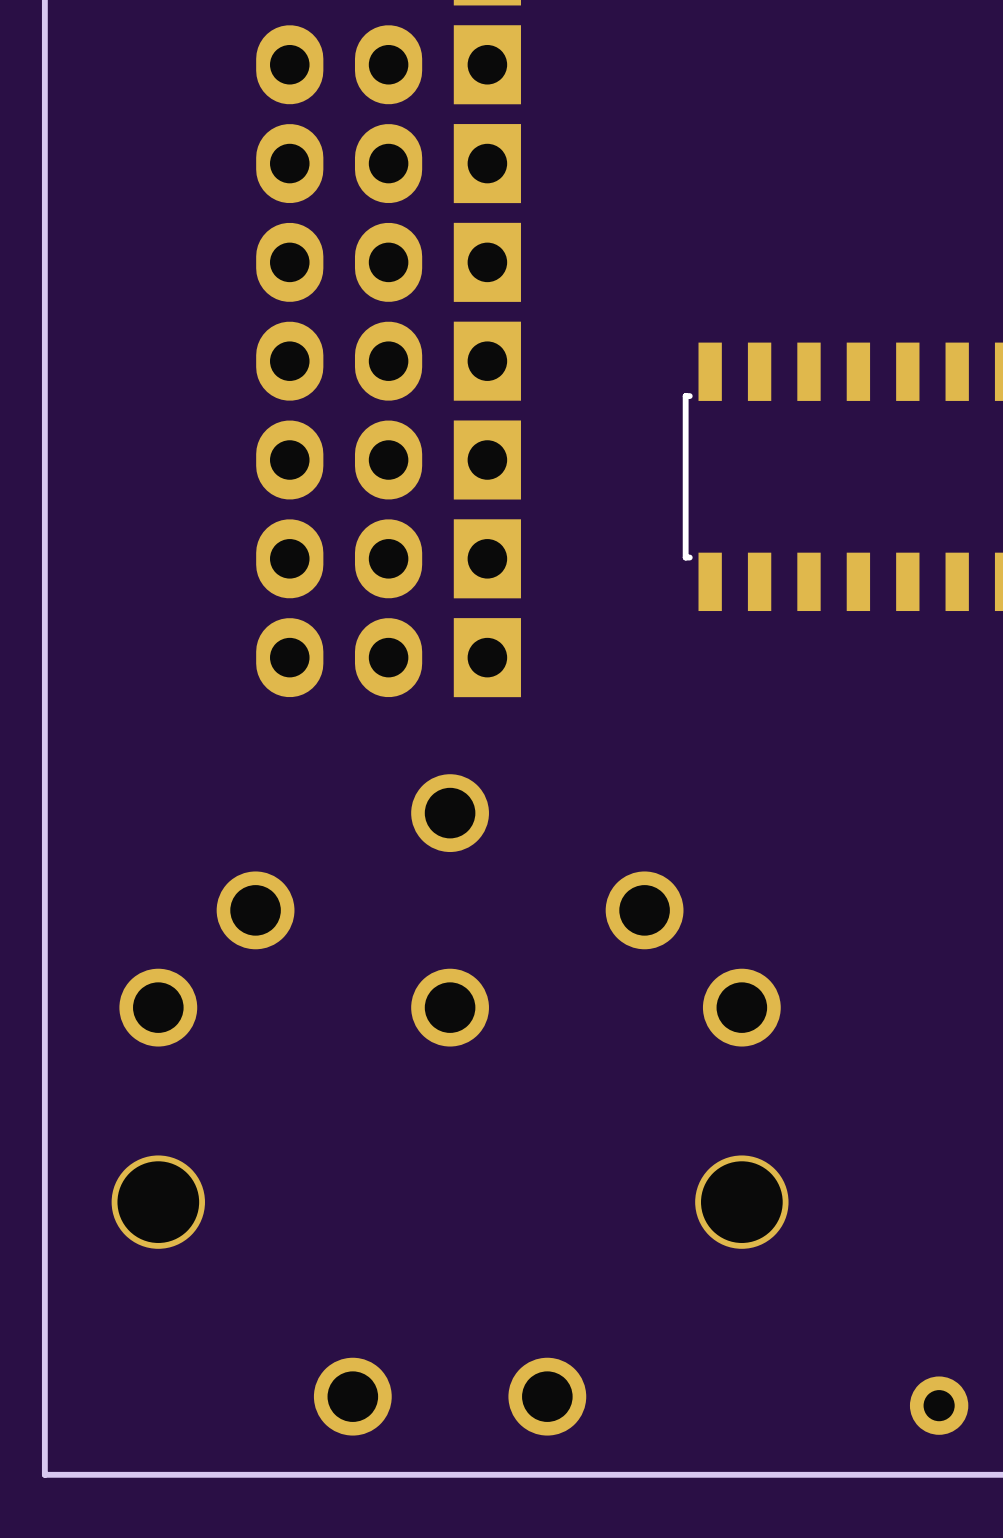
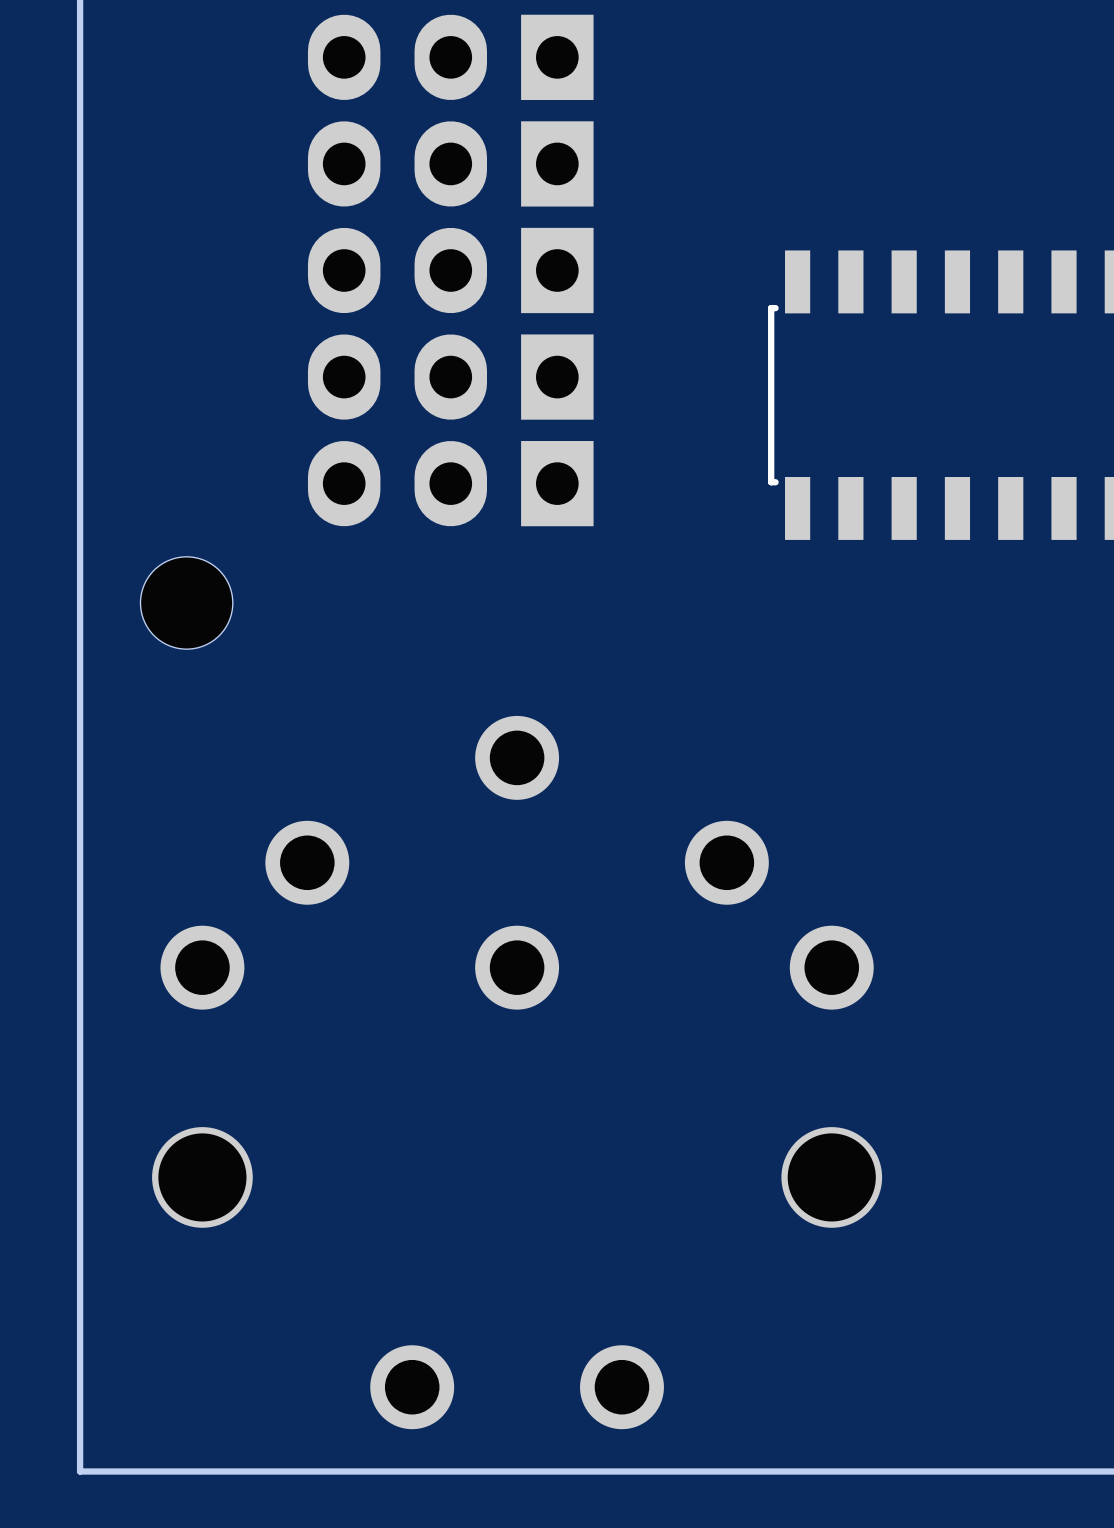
part: (388, 657) -> none
part: none -> (186, 602)
part: (939, 1405) -> none

